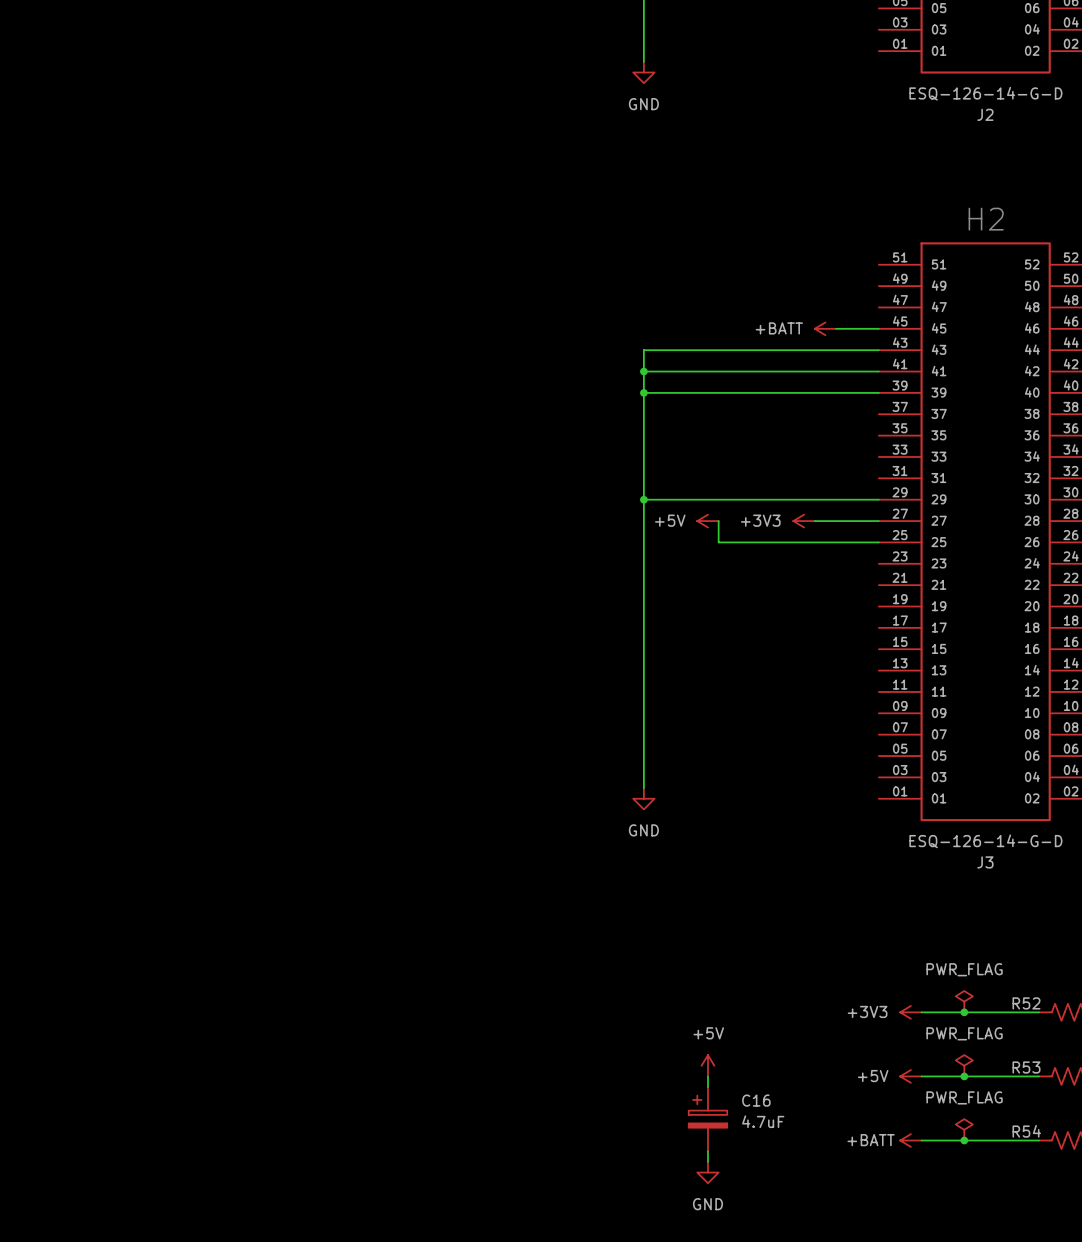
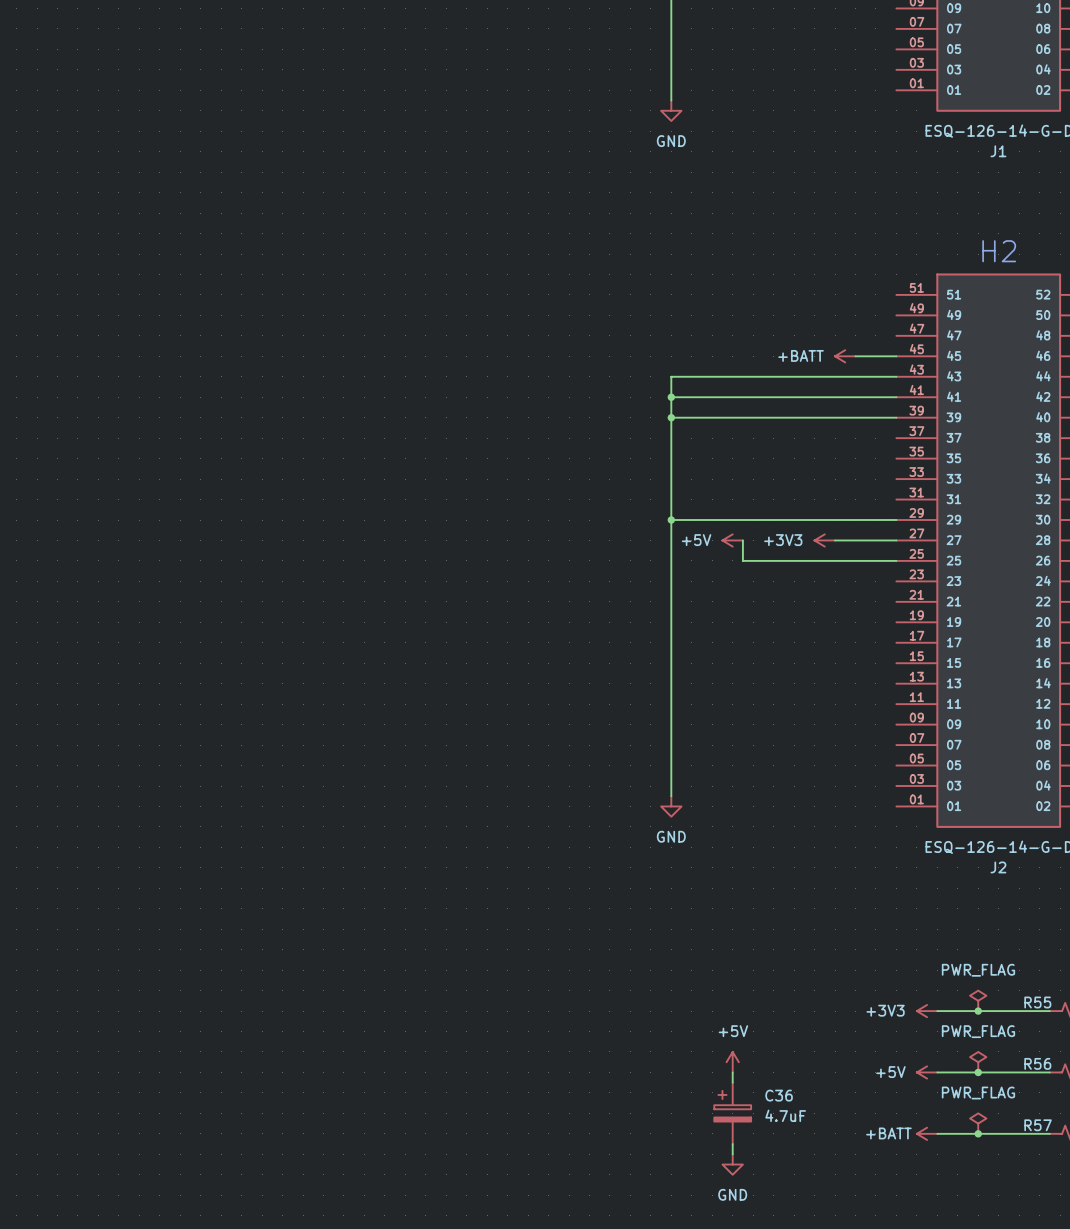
J2 name: J2 (985, 114) -> J1 (998, 151)
J3 name: J3 (985, 862) -> J2 (998, 867)
R52 name: R52 (1026, 1003) -> R55 (1037, 1002)
R53 name: R53 (1026, 1067) -> R56 (1037, 1063)
C16 name: C16 (756, 1100) -> C36 (779, 1095)
R54 name: R54 (1026, 1131) -> R57 (1038, 1125)

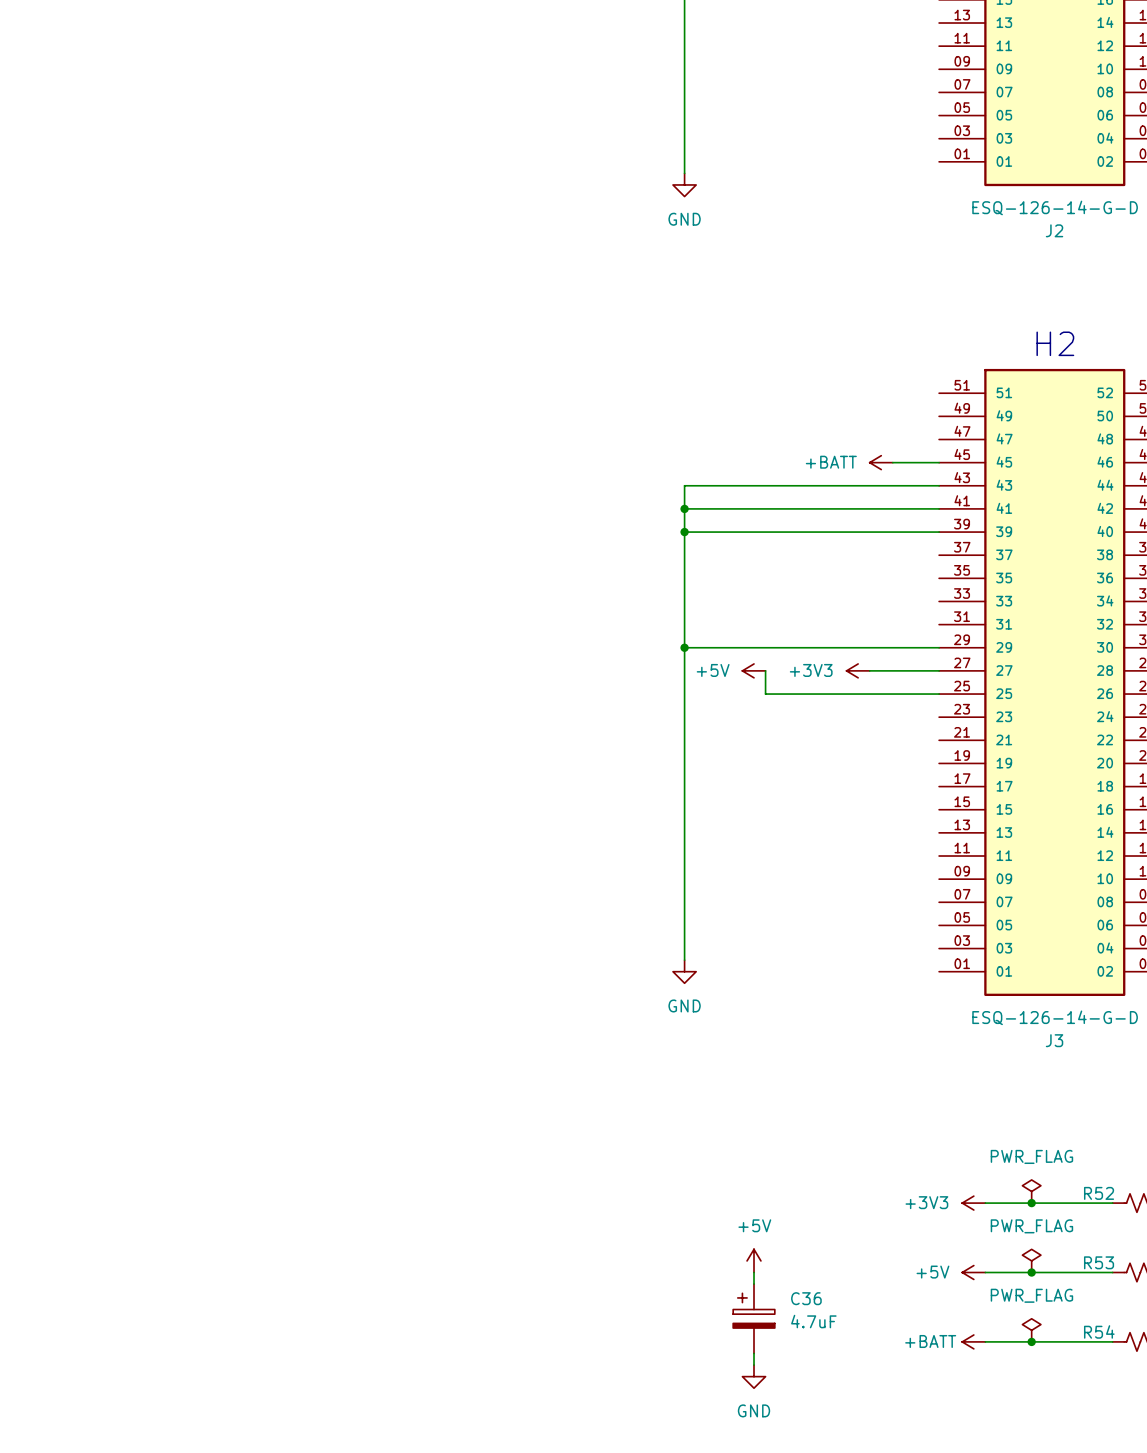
J1 name: J1 (998, 151) -> J2 (1054, 230)
J2 name: J2 (998, 867) -> J3 (1054, 1040)
R55 name: R55 (1037, 1002) -> R52 (1099, 1193)
R56 name: R56 (1037, 1063) -> R53 (1099, 1262)
R57 name: R57 (1038, 1125) -> R54 (1099, 1331)

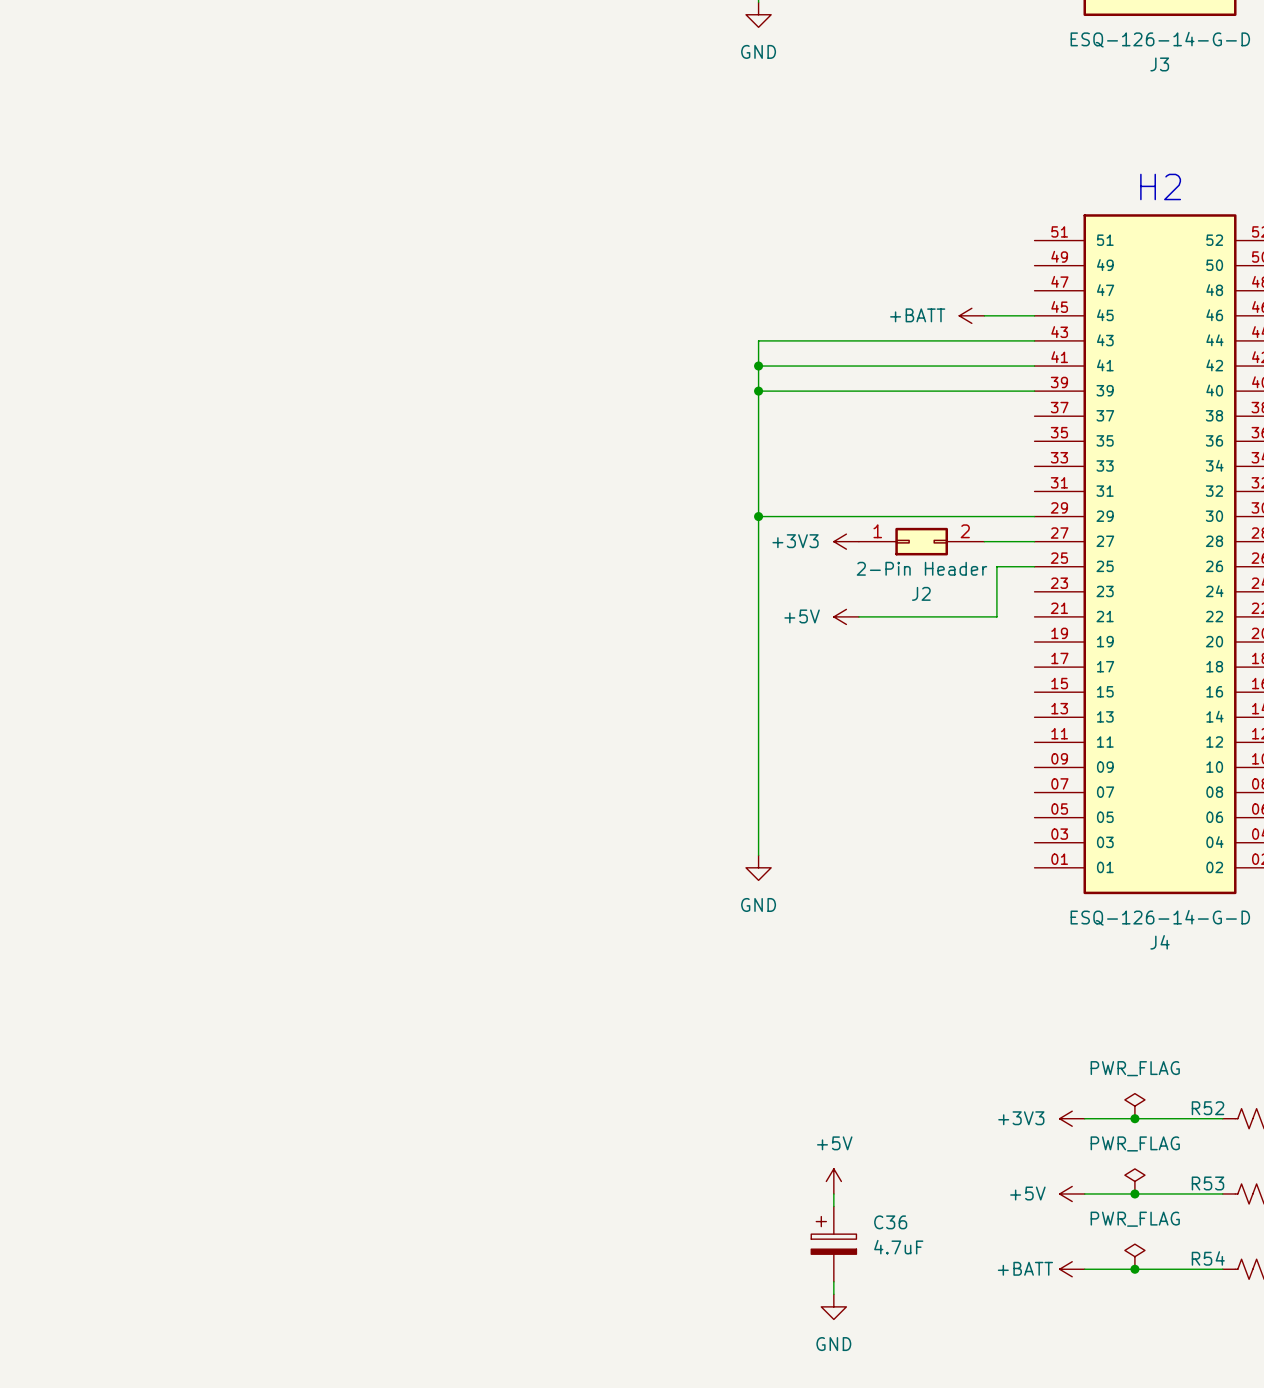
J2 name: J2 (1054, 230) -> J3 (1159, 64)
power symbol position: +5V (754, 670) -> +5V (846, 616)
wire: (765, 670) (765, 694) (904, 694) -> (858, 616) (996, 616) (996, 566)
J2: none -> 2-Pin Header (921, 541)
power symbol position: +3V3 (858, 670) -> +3V3 (846, 541)
J3 name: J3 (1054, 1040) -> J4 (1160, 942)

